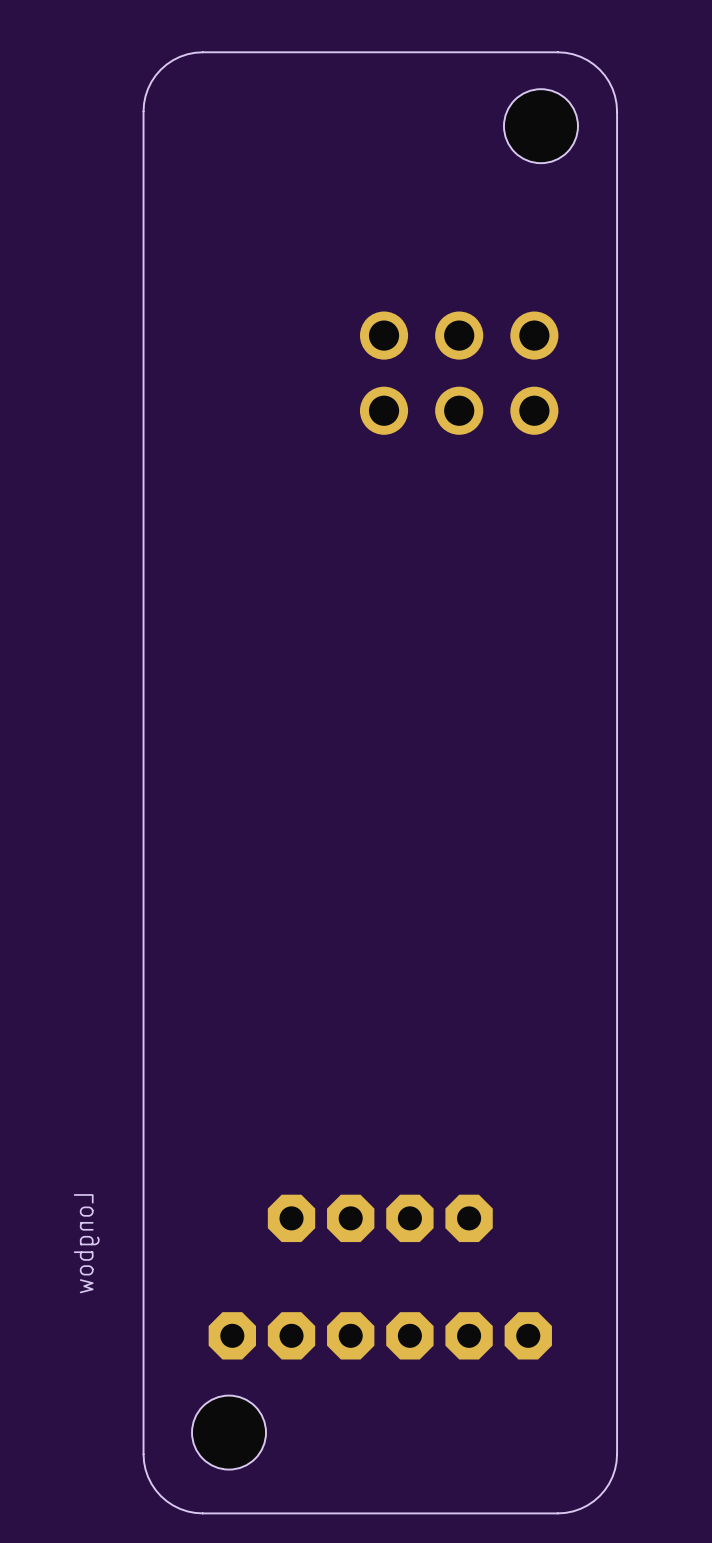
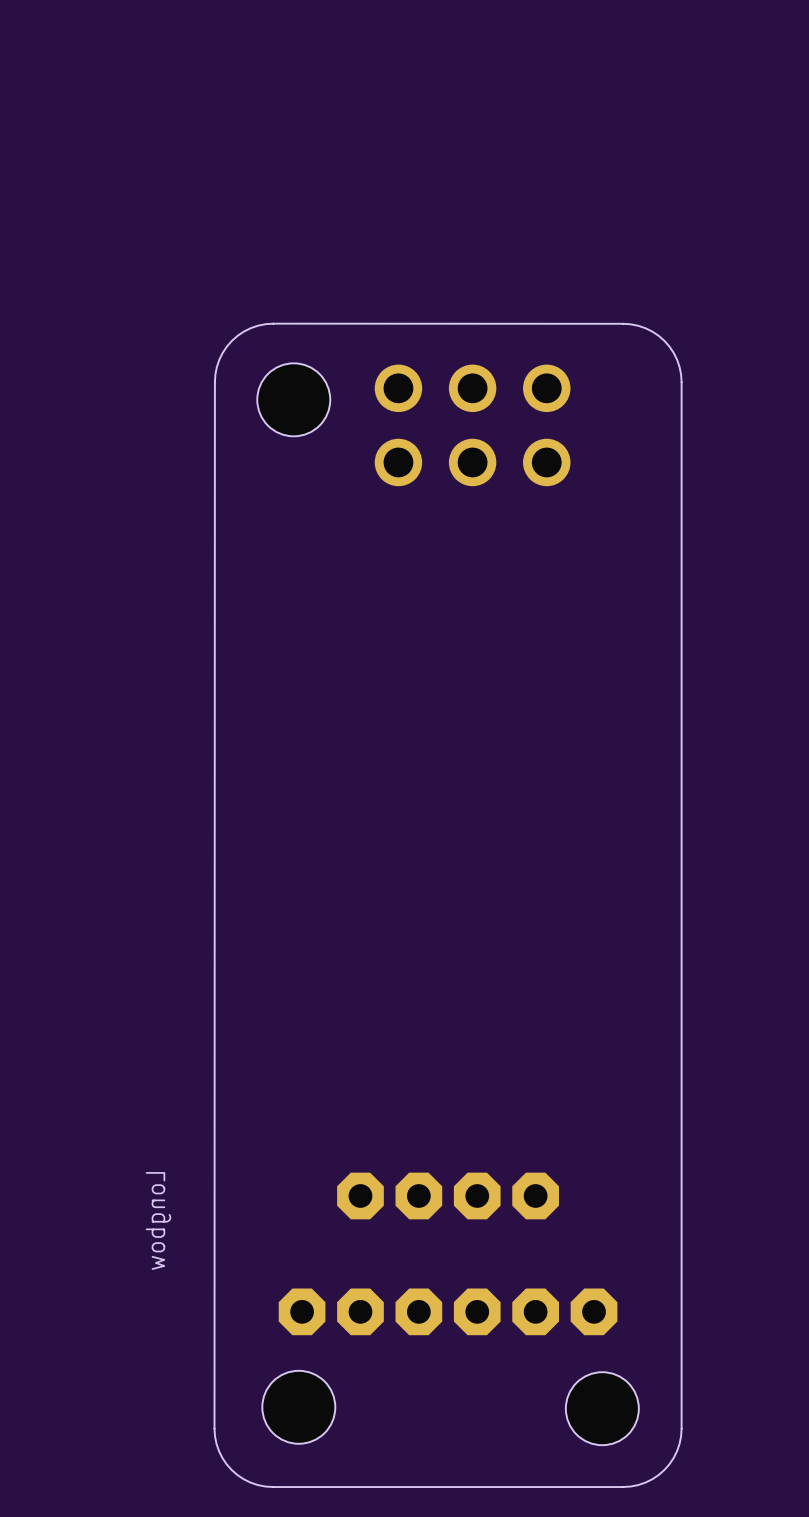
part position: (540, 126) -> (293, 399)
part position: (459, 373) -> (472, 425)
board edge: (617, 393) (616, 103) (609, 81) (593, 64) (580, 56) (557, 52) (202, 52) (180, 56) (166, 64) (155, 75) (148, 88) (143, 111) (143, 1454) -> (681, 382) (677, 359) (664, 340) (645, 328) (623, 323) (265, 324) (250, 328) (237, 335) (226, 346) (219, 359) (214, 382) (214, 1428)
part: none -> (602, 1408)

